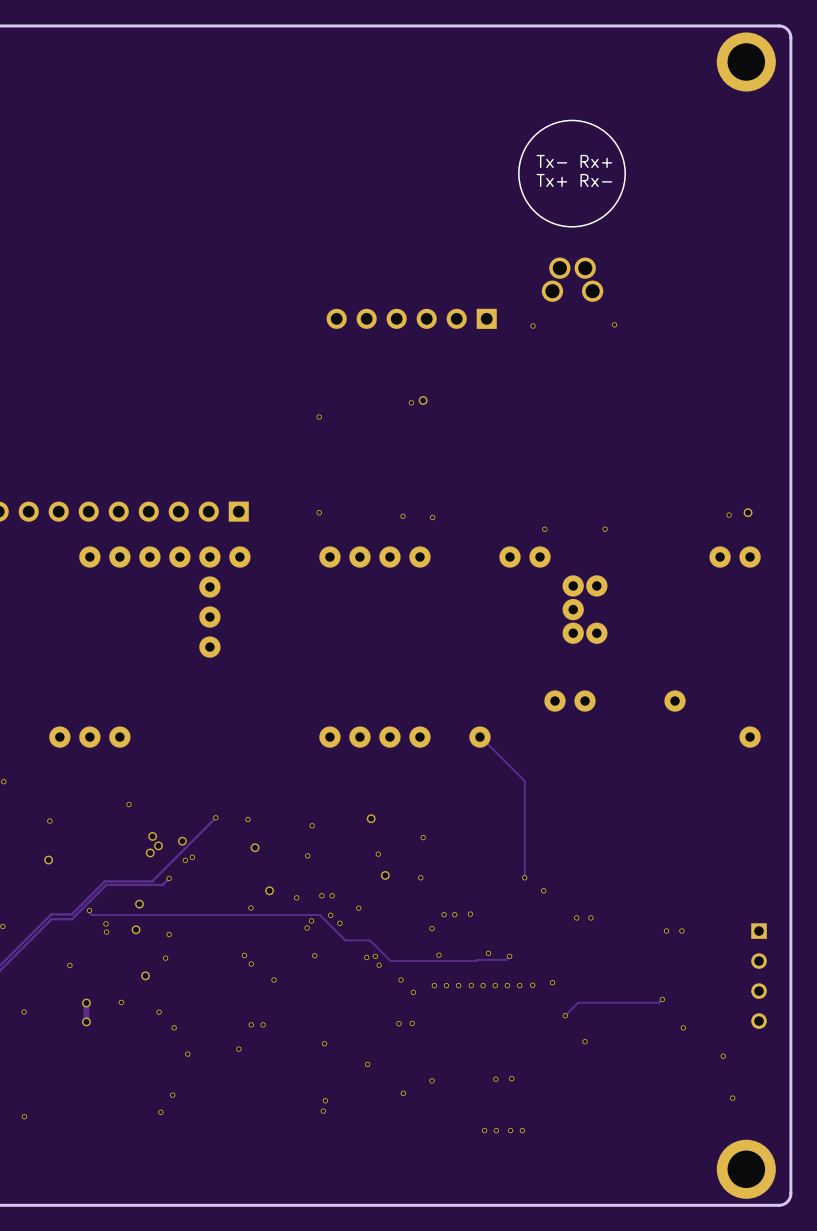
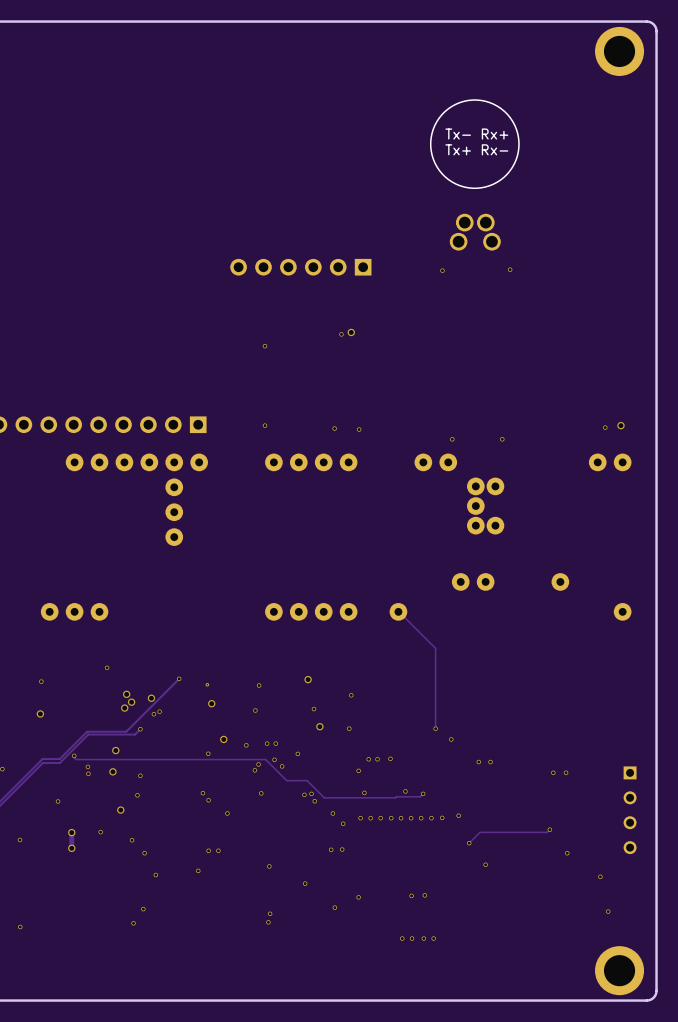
part position: (411, 318) -> (300, 267)
via: (3, 781) -> none
via: (247, 819) -> none
via: none -> (207, 684)

